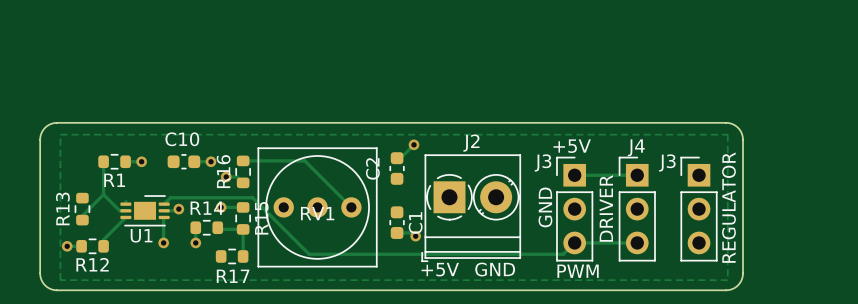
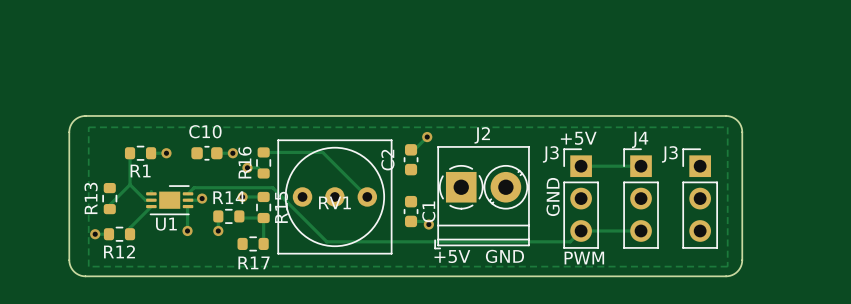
text: REGULATOR (728, 207) -> none
text: DRIVER (606, 208) -> none

